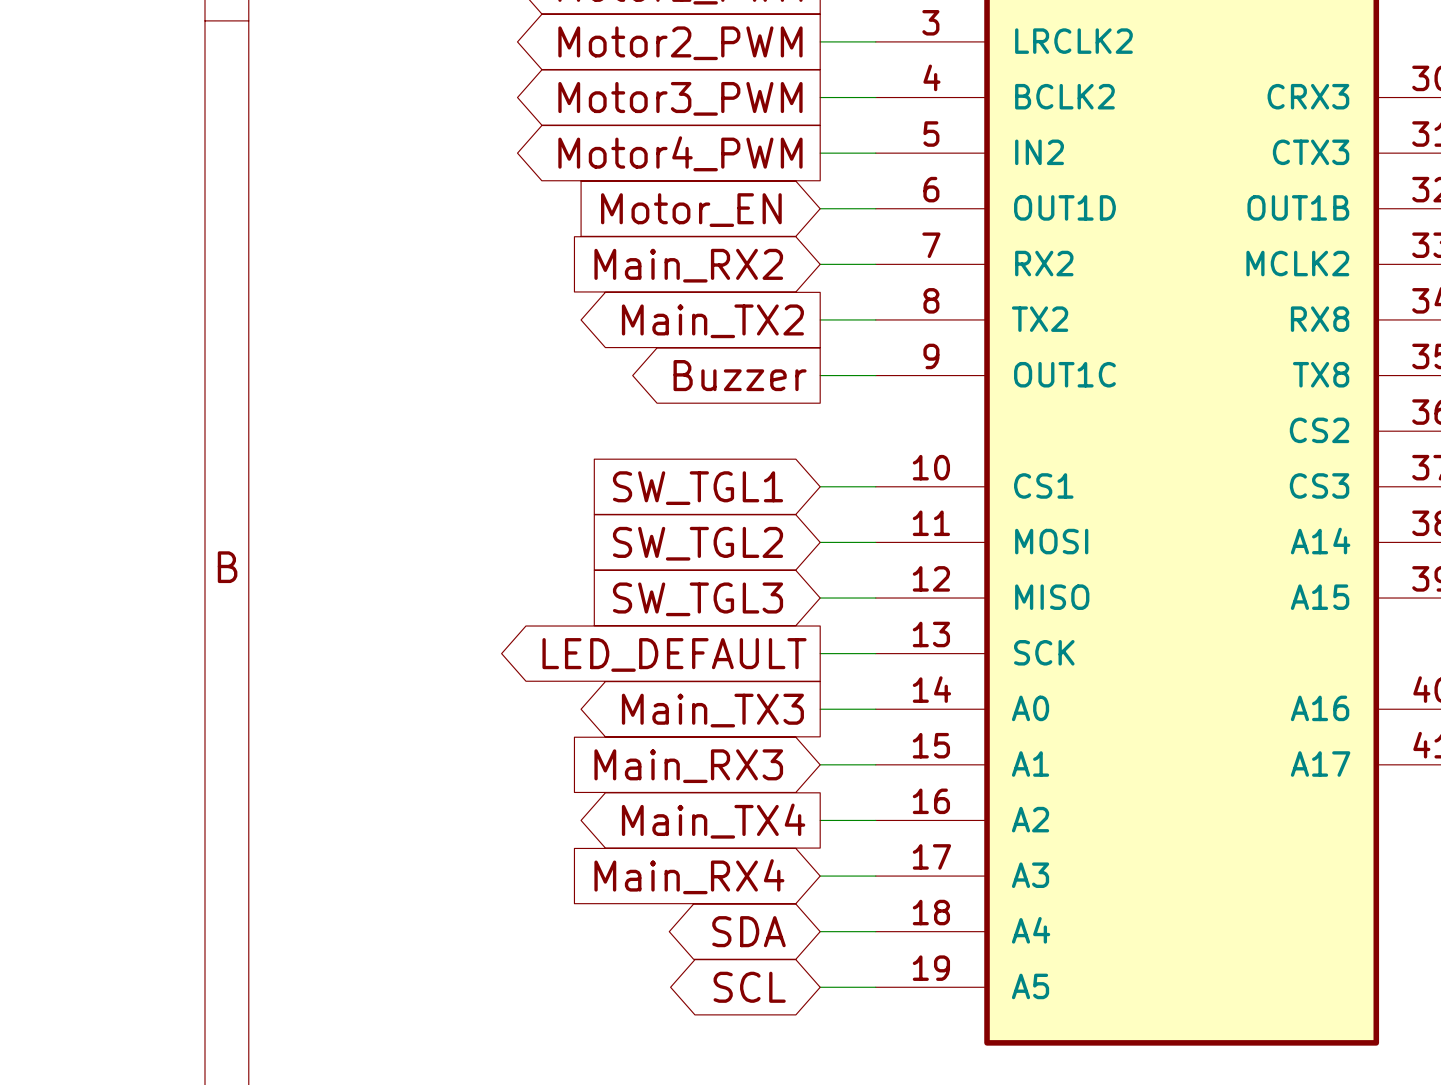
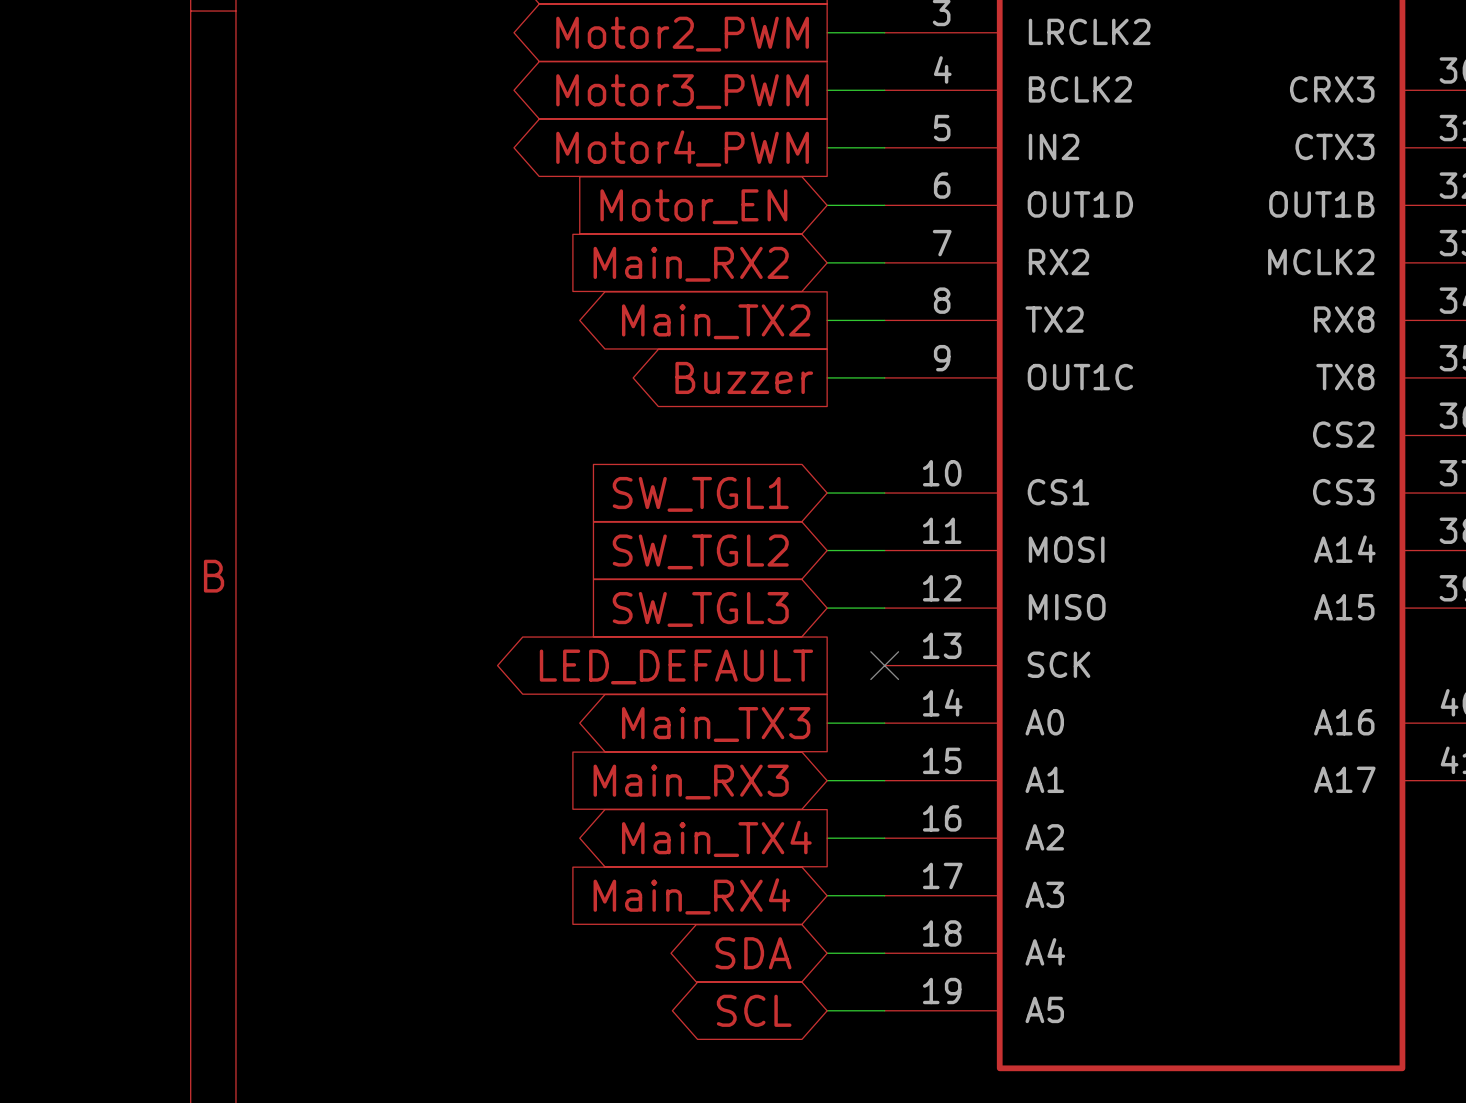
wire: (820, 653) (875, 653) -> none
no-connect mark: none -> (884, 665)

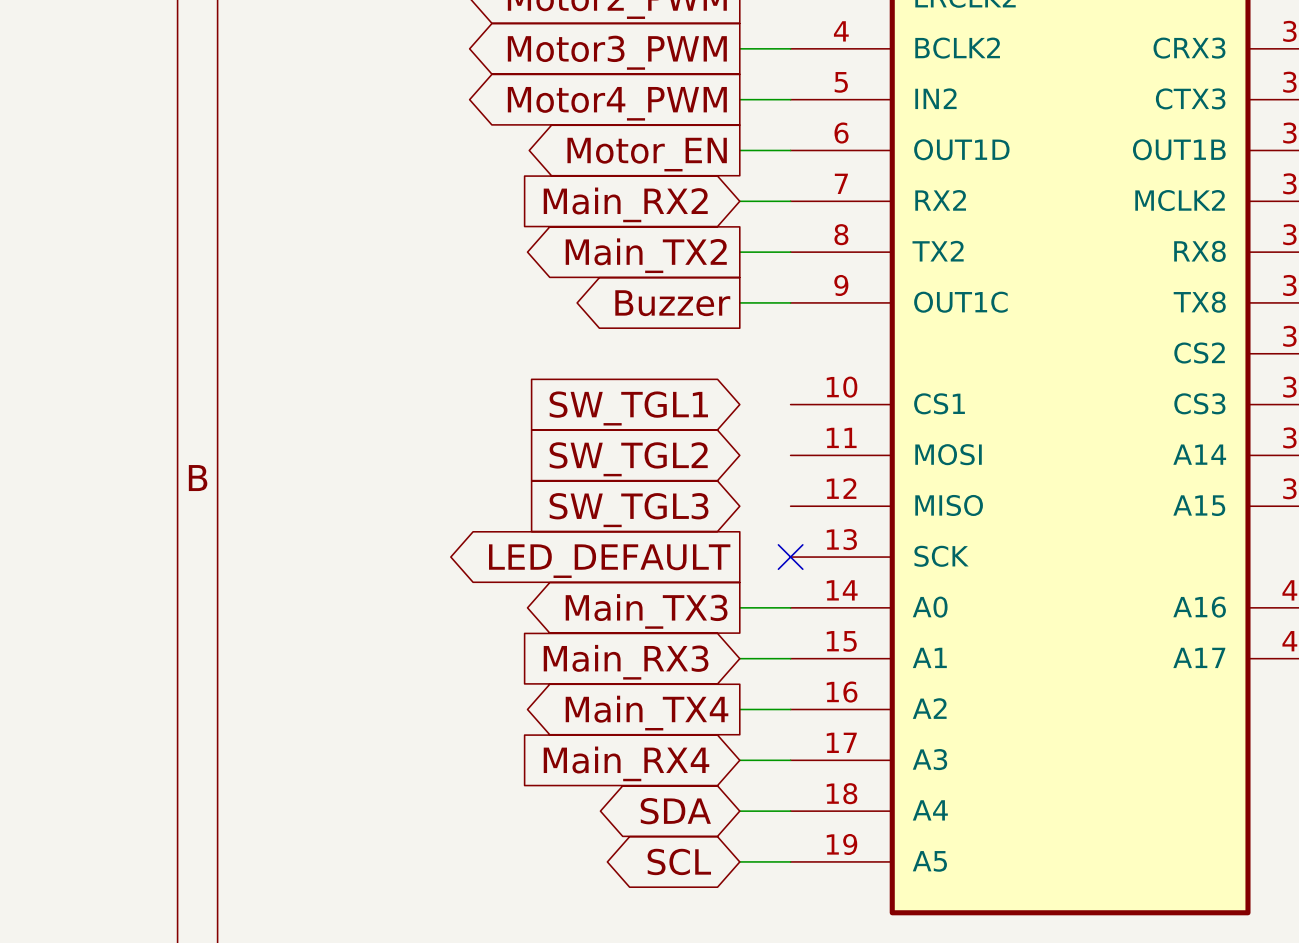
global label shape: input (693, 206) -> output (647, 154)
wire: (827, 493) (884, 493) -> none
wire: (827, 550) (884, 550) -> none
wire: (827, 608) (884, 608) -> none

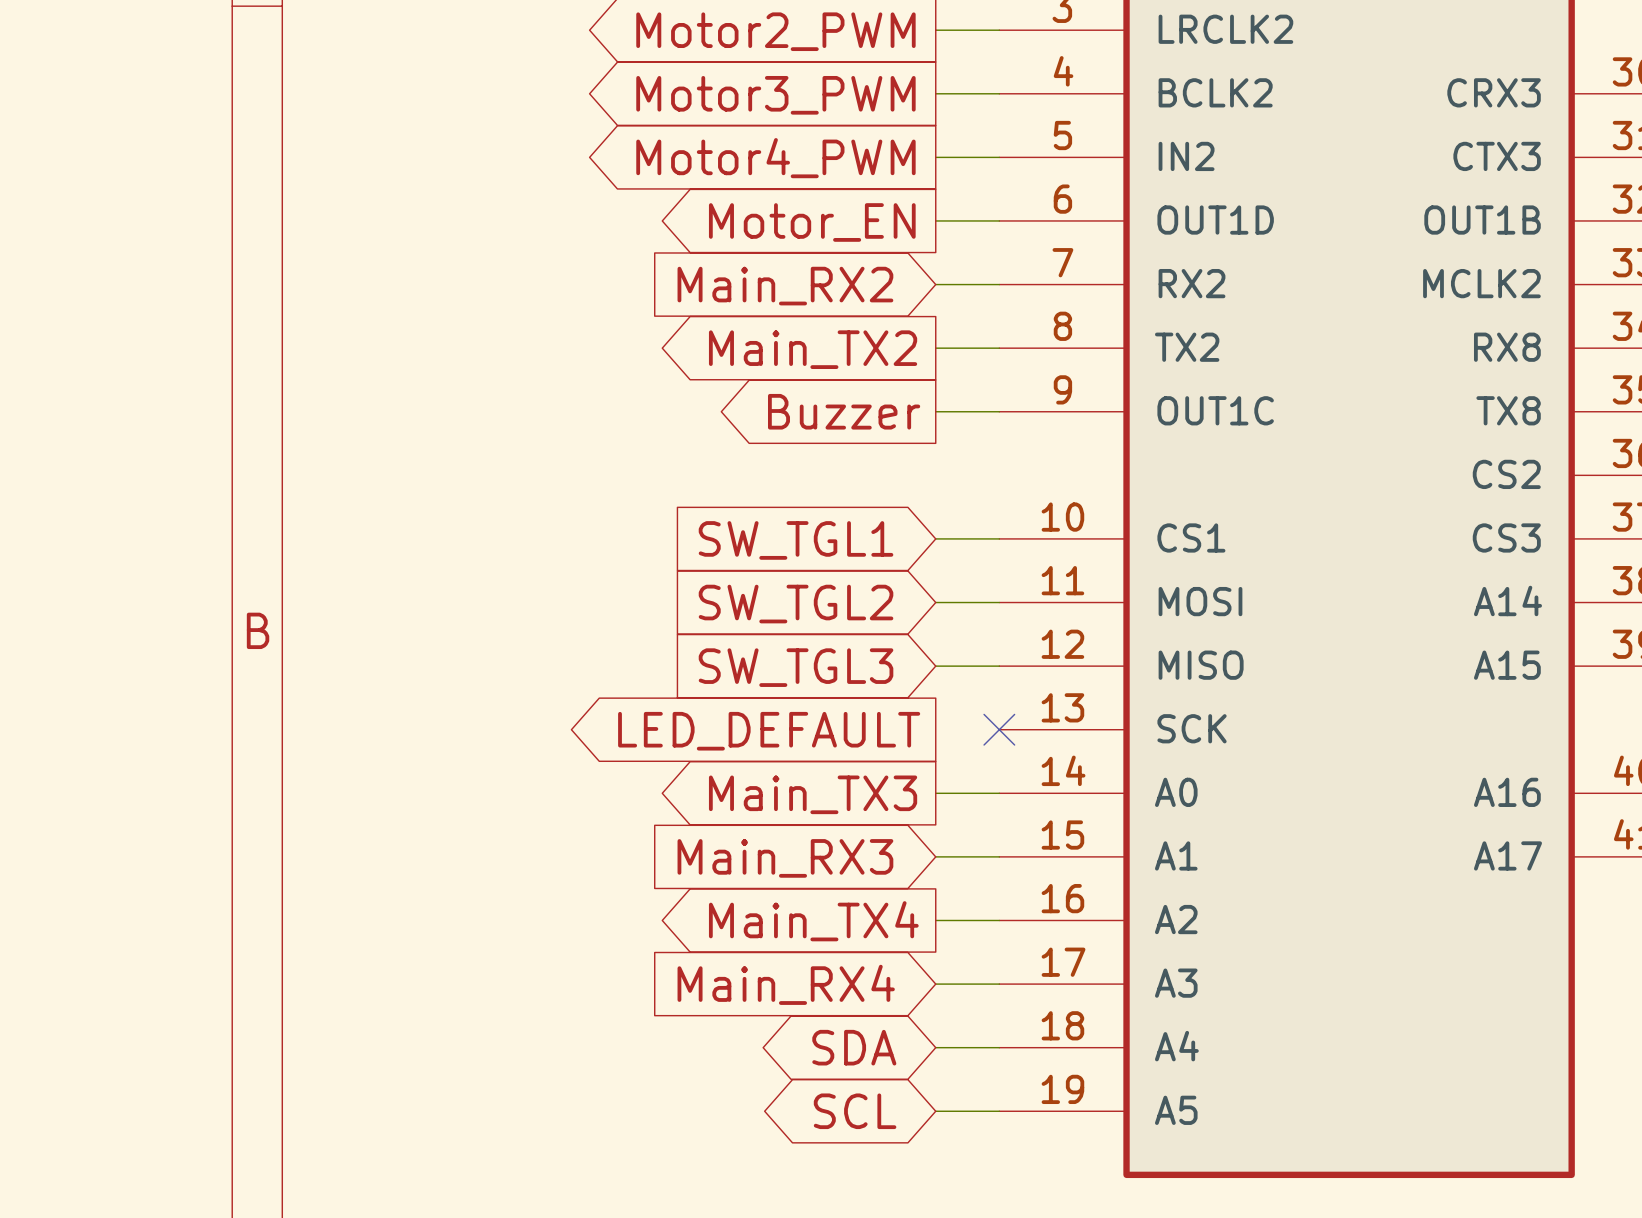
wire: none -> (935, 538) (999, 538)
wire: none -> (935, 602) (999, 602)
wire: none -> (935, 666) (999, 666)

